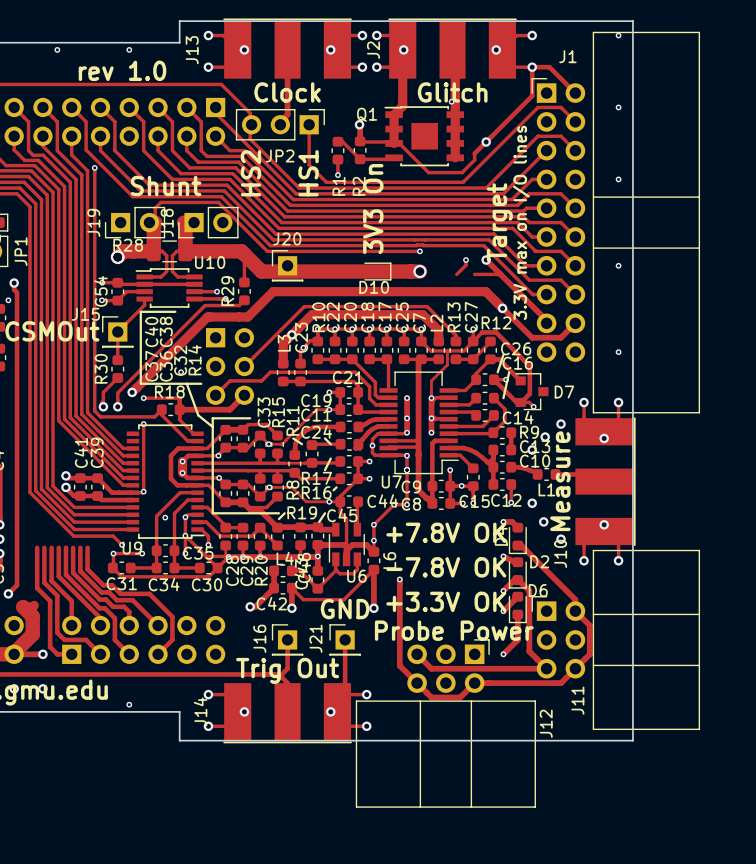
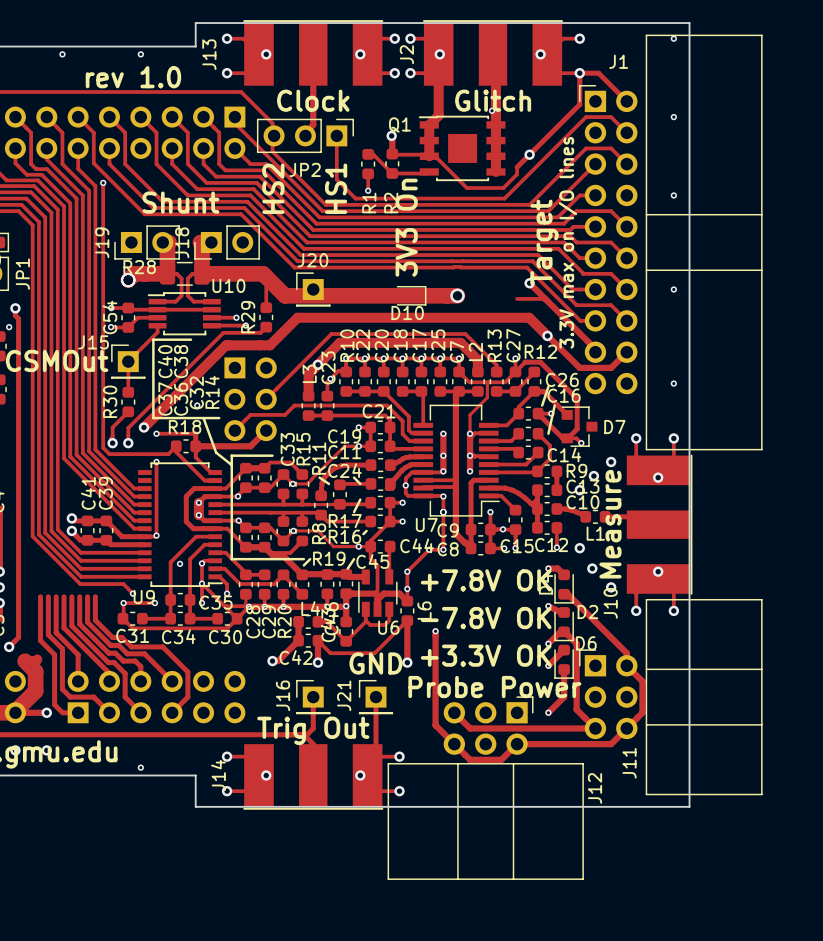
track: (155, 222) (155, 208) (160, 202) (218, 202) (267, 251) (419, 251) -> none
via: (419, 251) -> none
track: (466, 260) (466, 265) (456, 274) -> none
via: (466, 260) -> none

